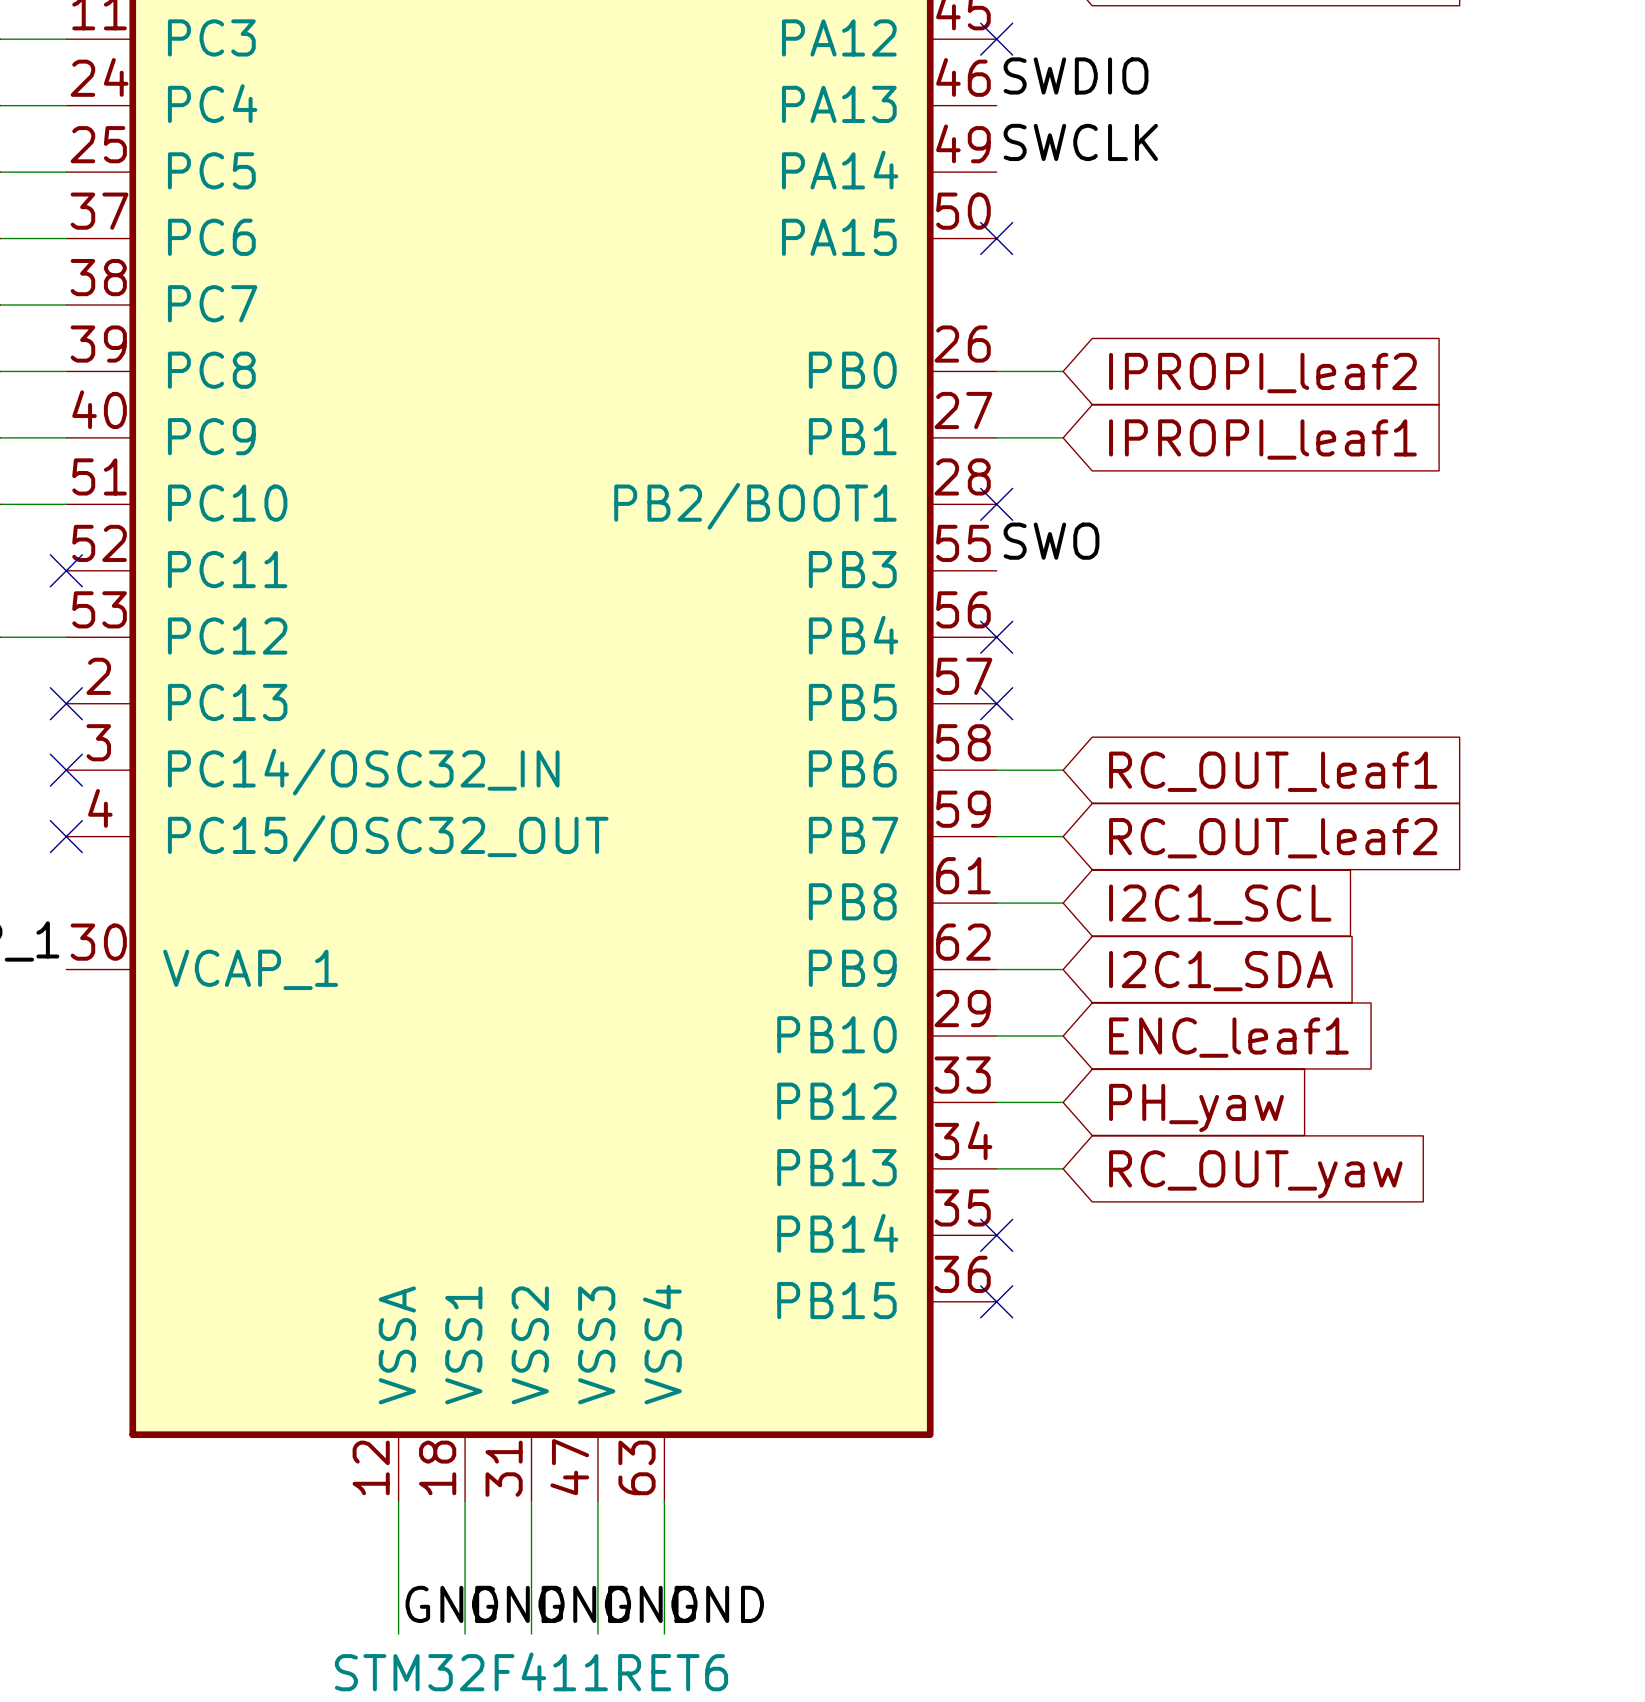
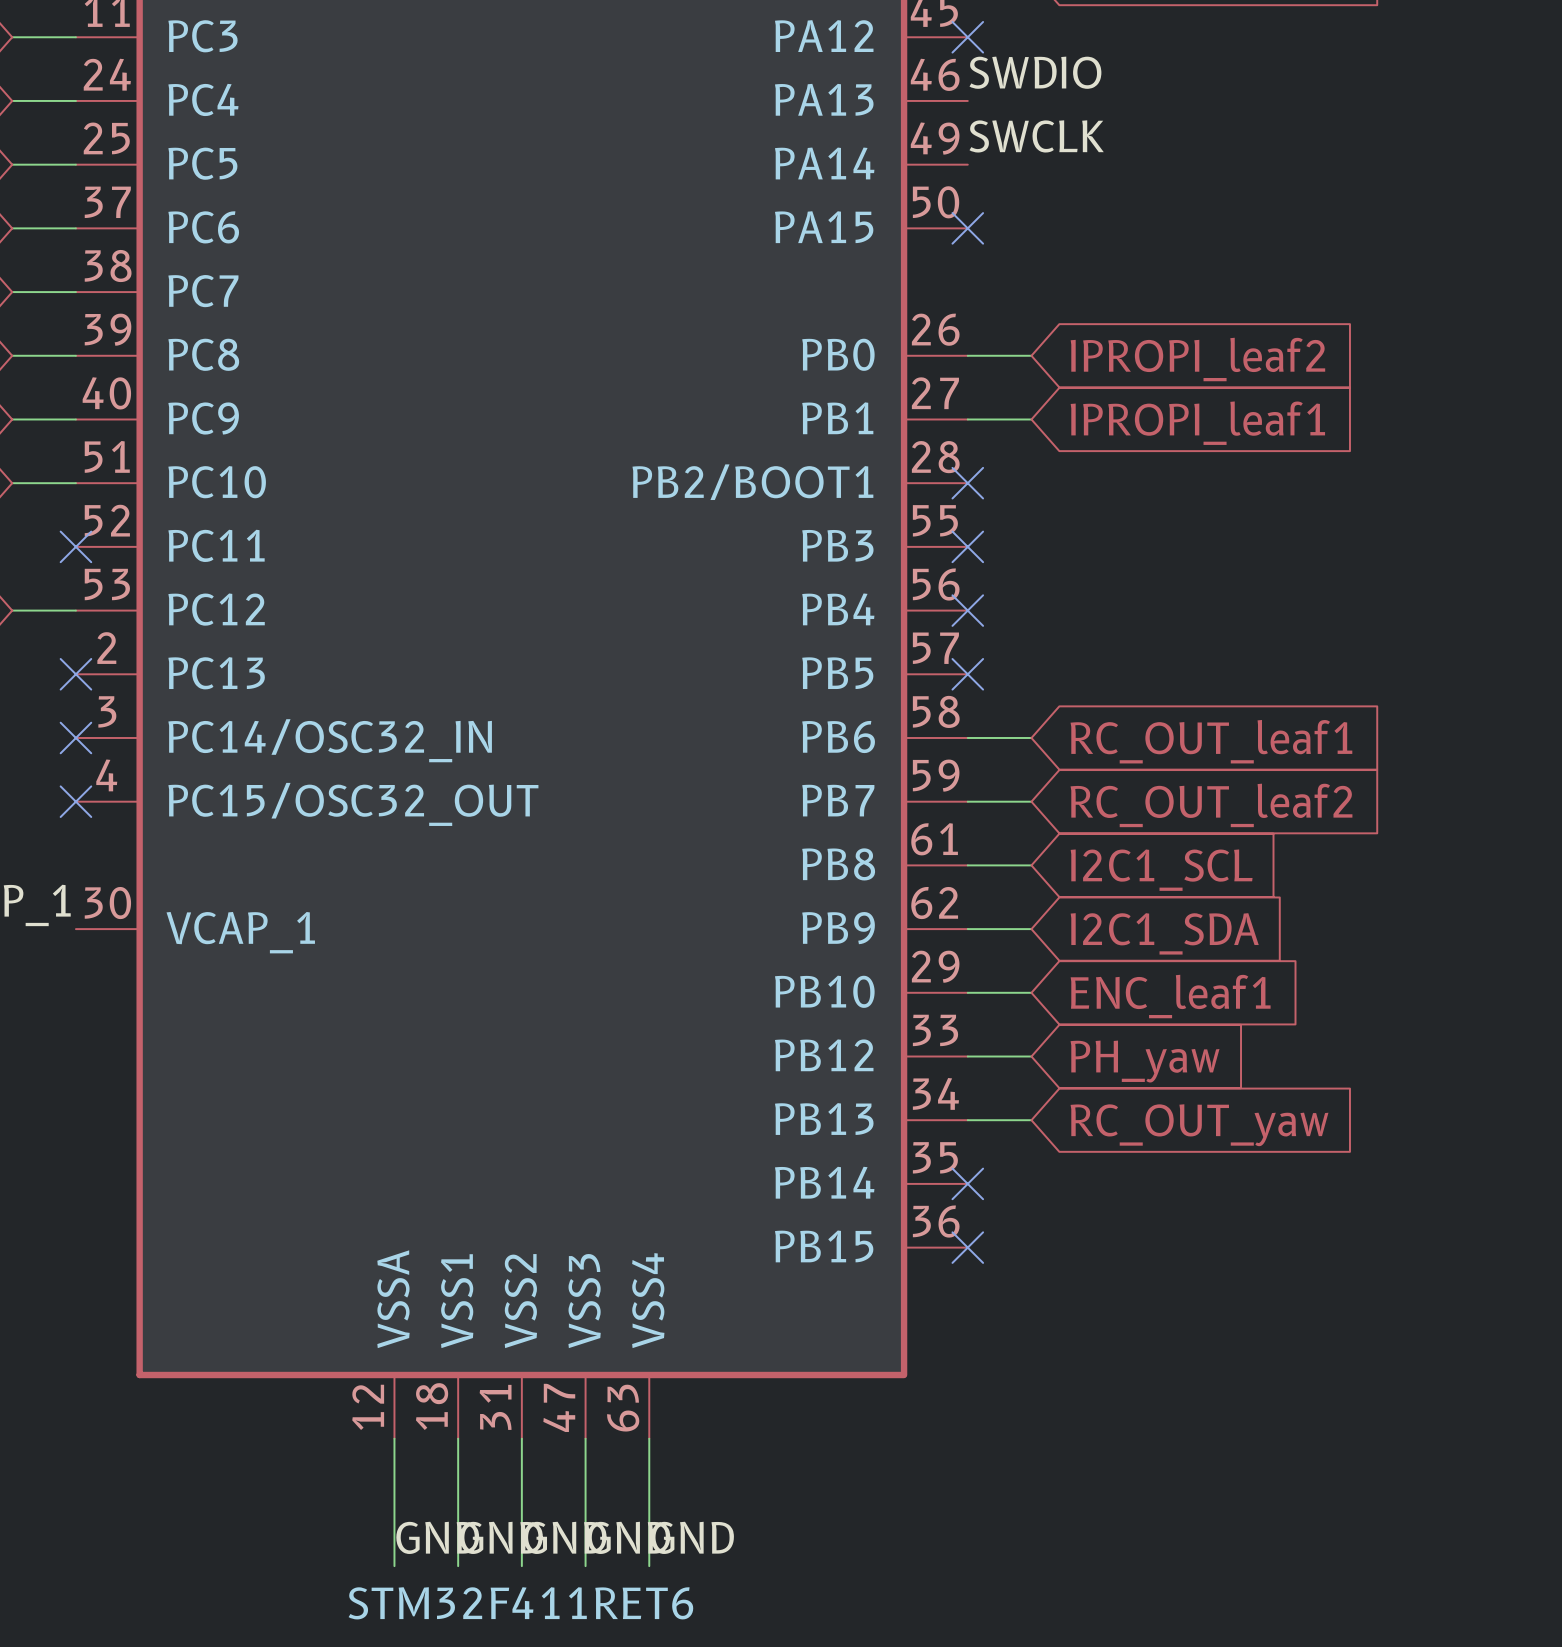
label: SWO (1051, 541) -> none
no-connect mark: none -> (967, 546)

